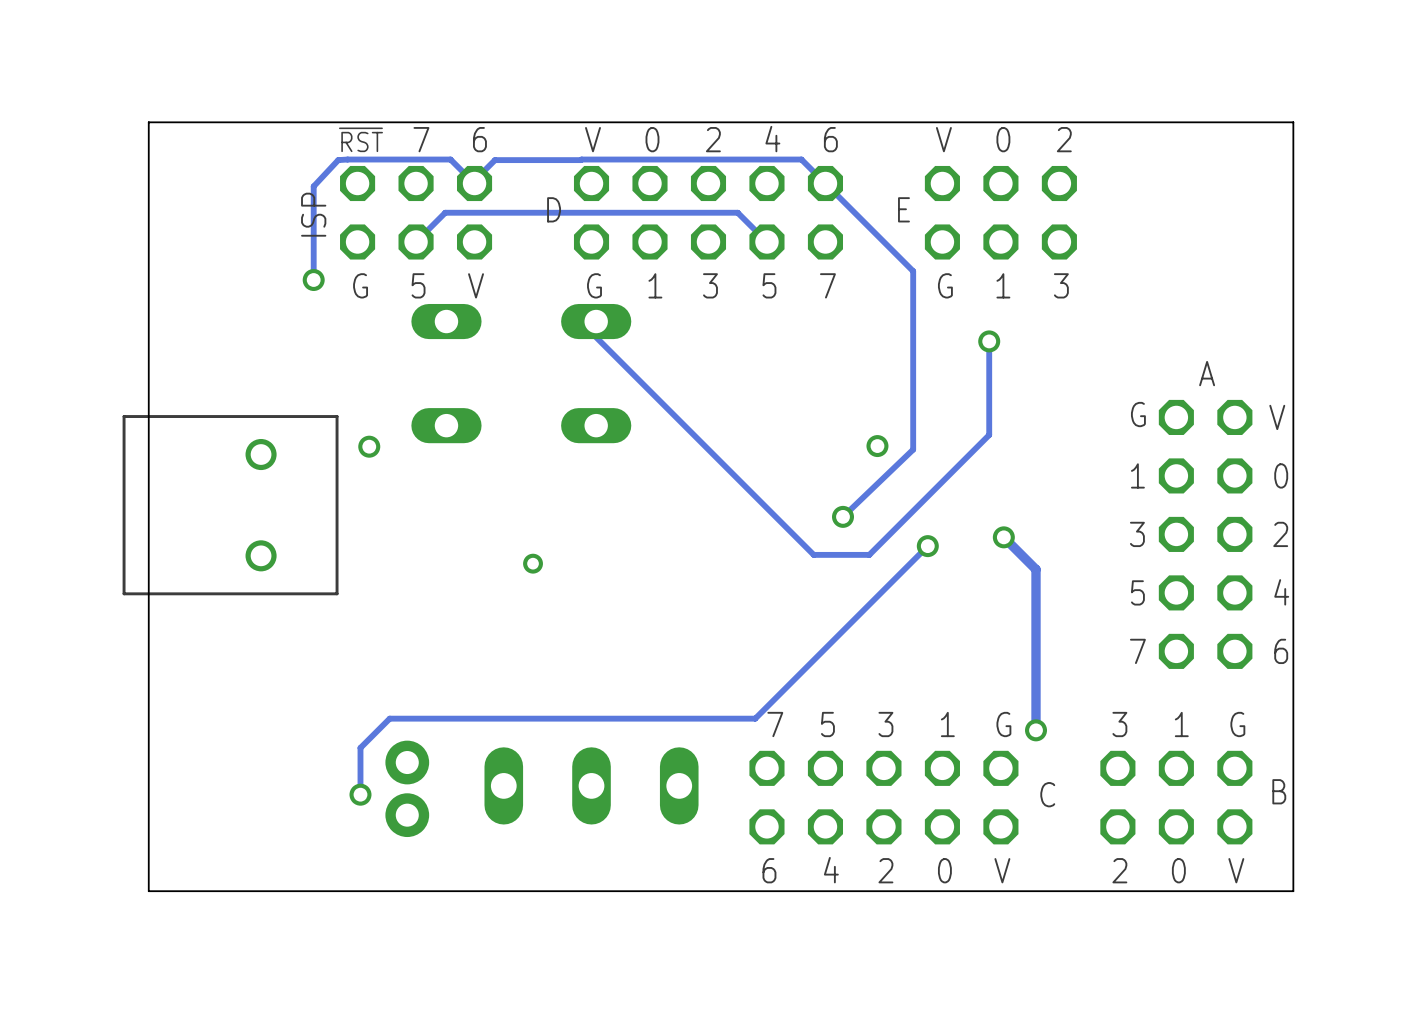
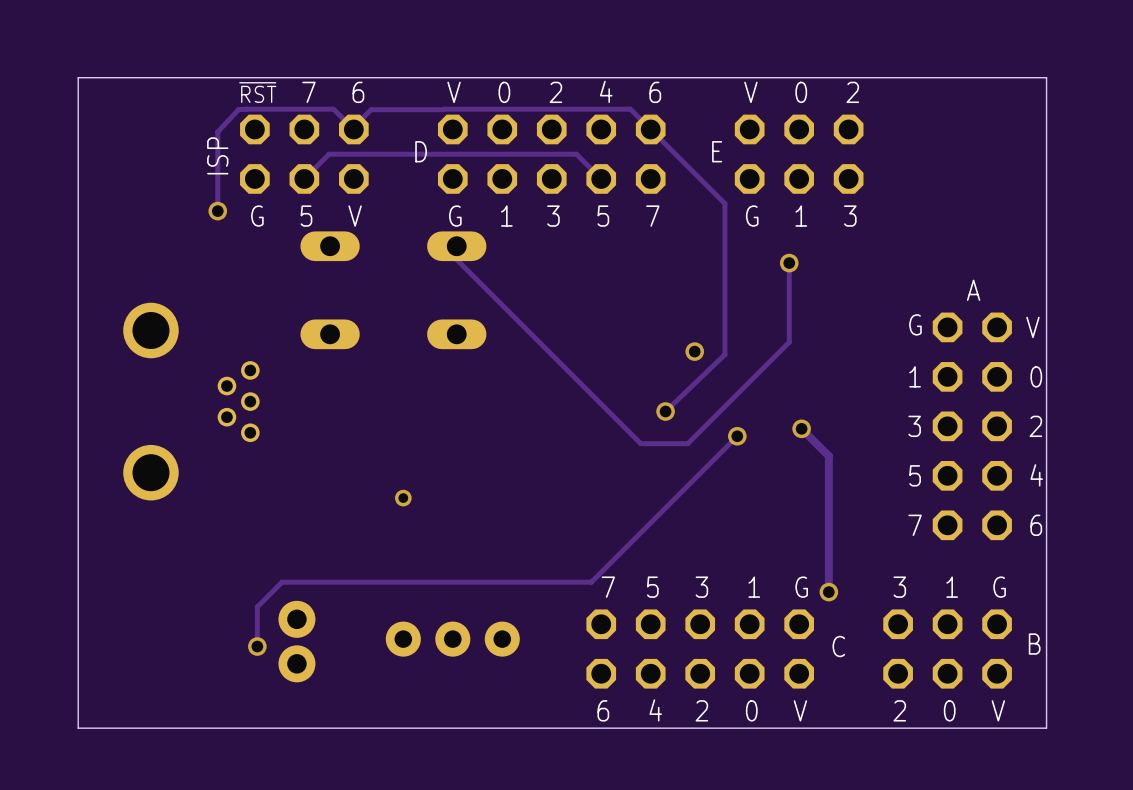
via: (369, 446) -> none
part: (230, 505) -> none
part: none -> (191, 401)
via position: (533, 563) -> (403, 498)
part footprint: [484, 747, 699, 825] -> [385, 621, 520, 657]

